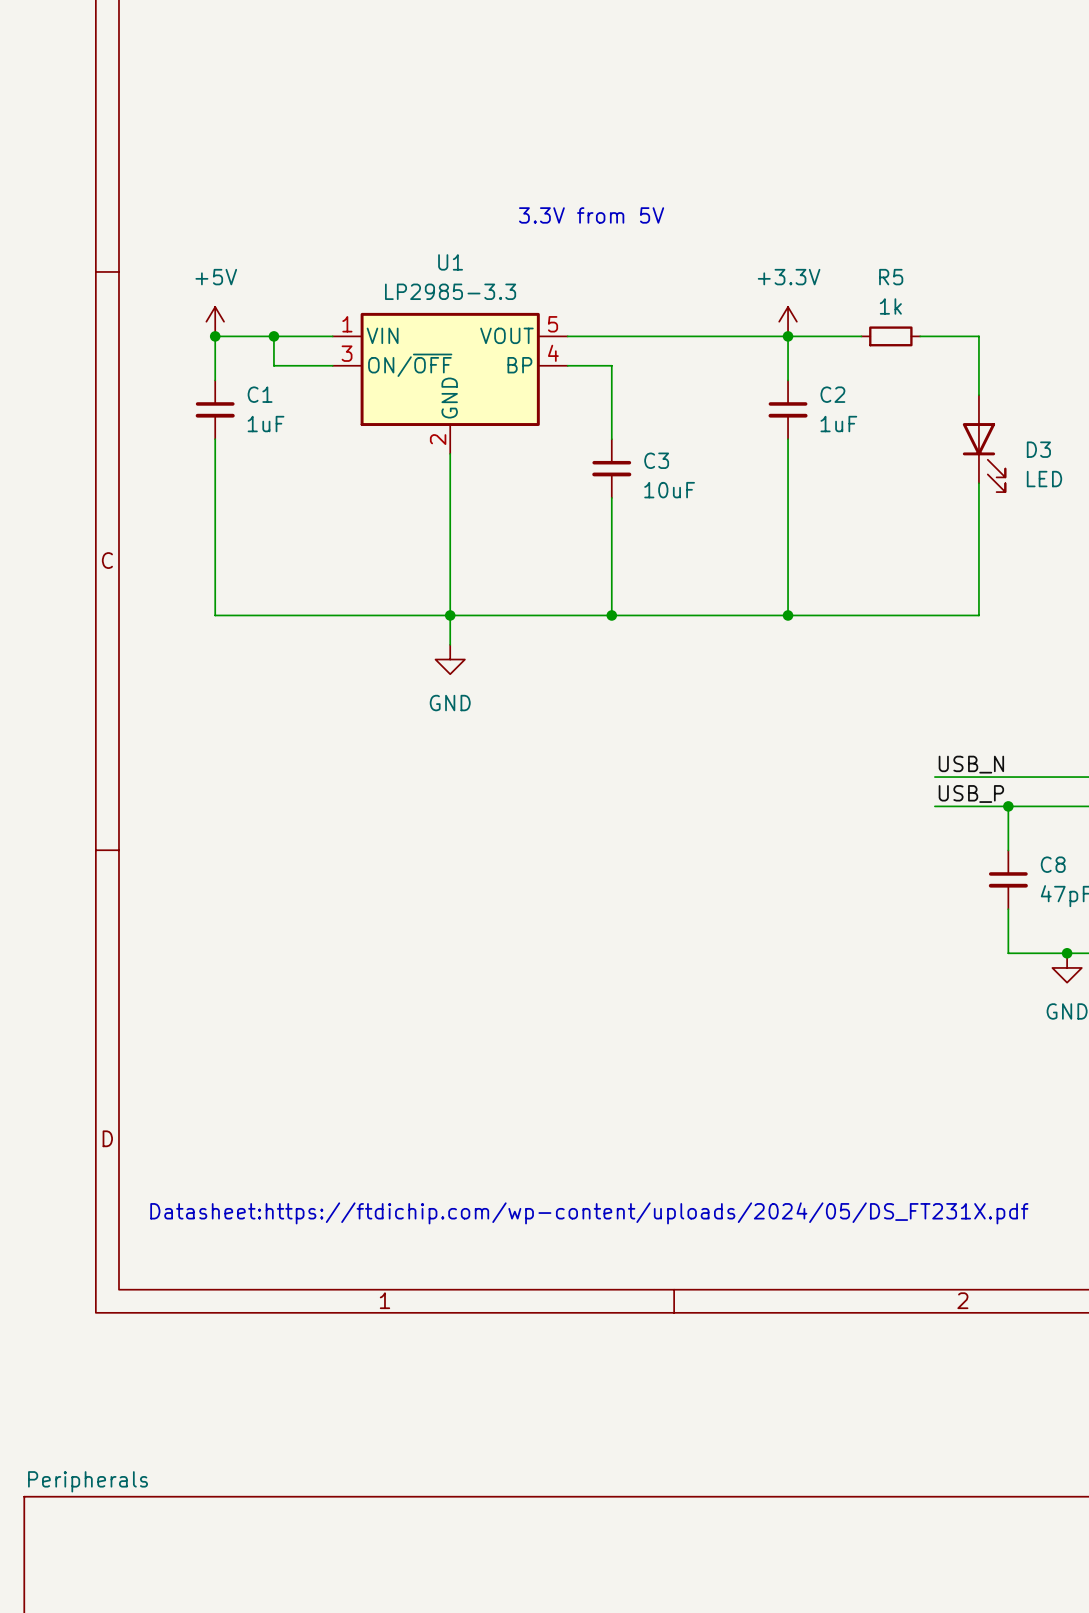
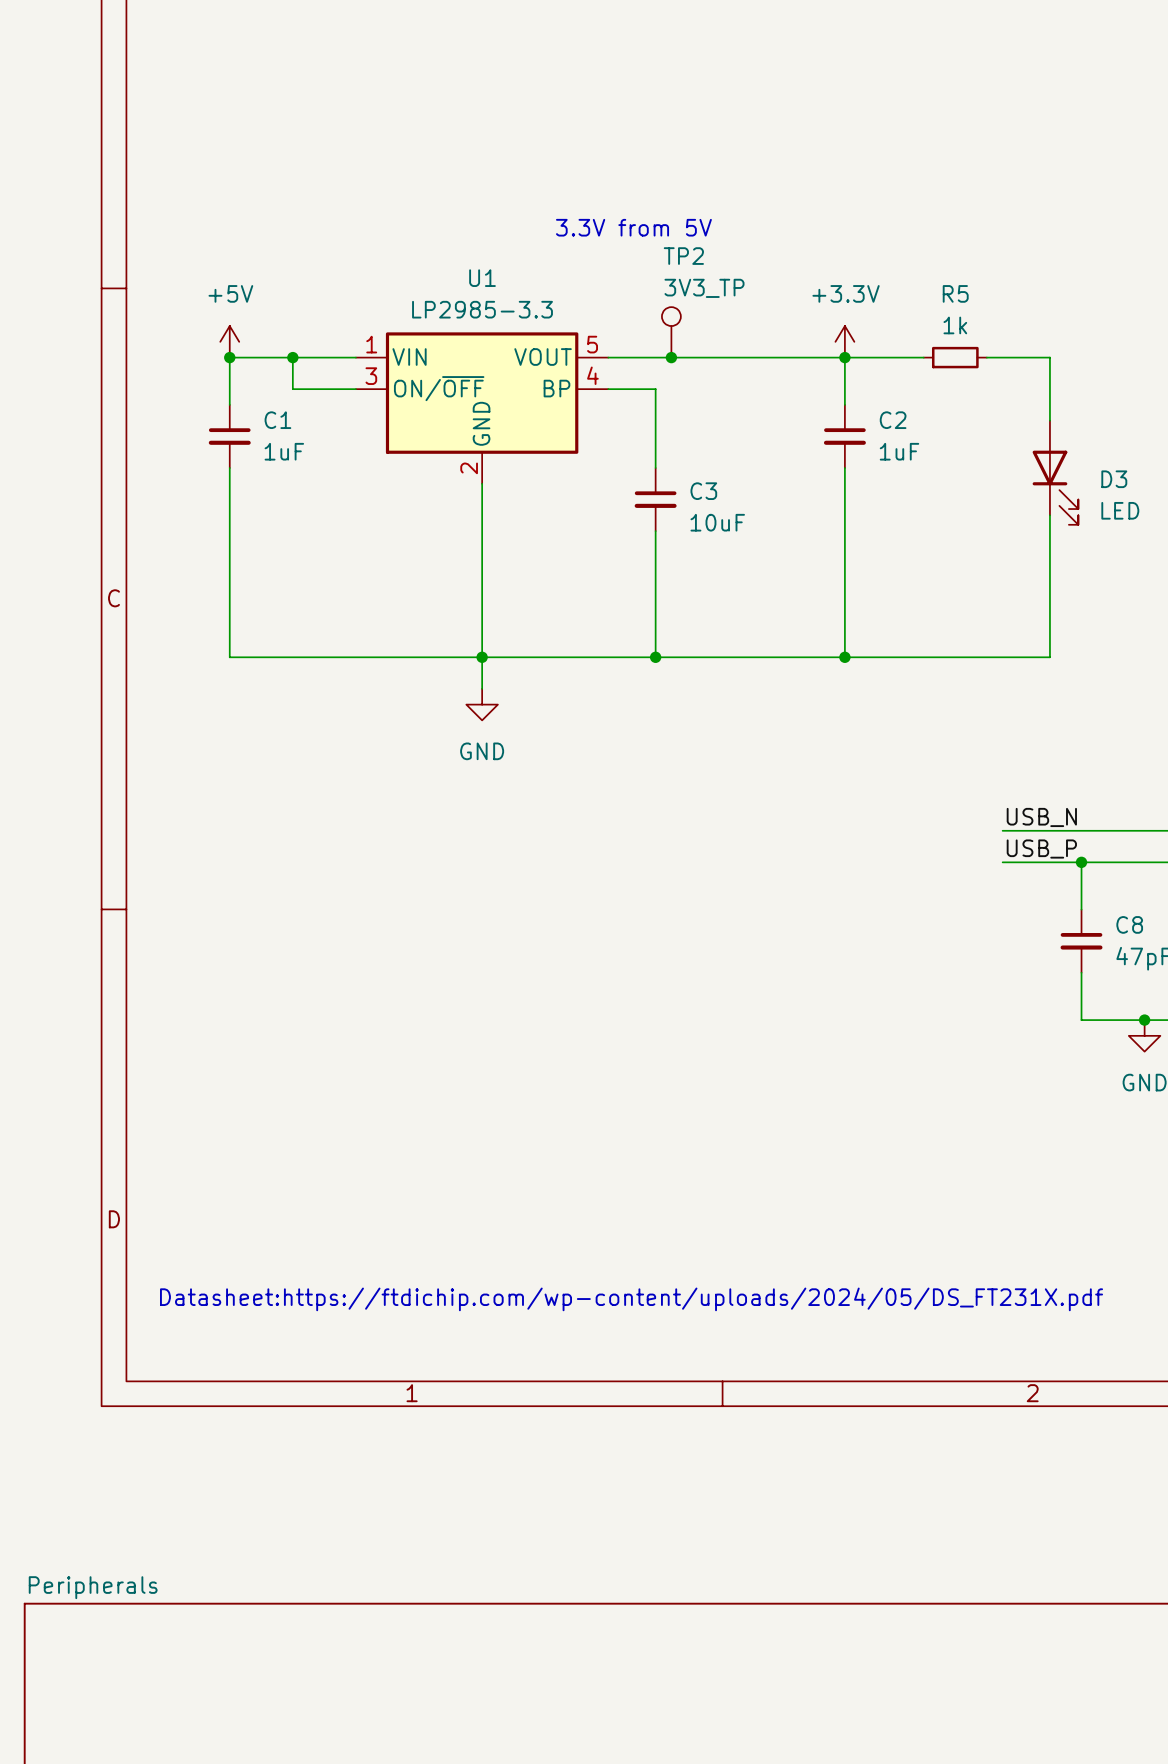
TP2: none -> 3V3_TP (671, 332)
junction: none -> (671, 357)

